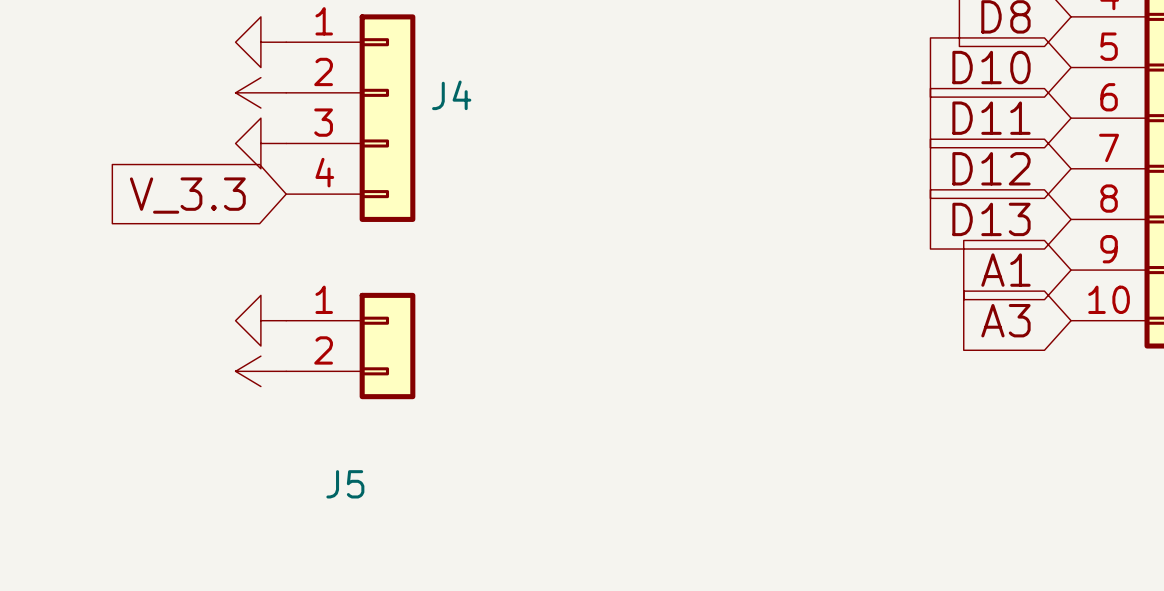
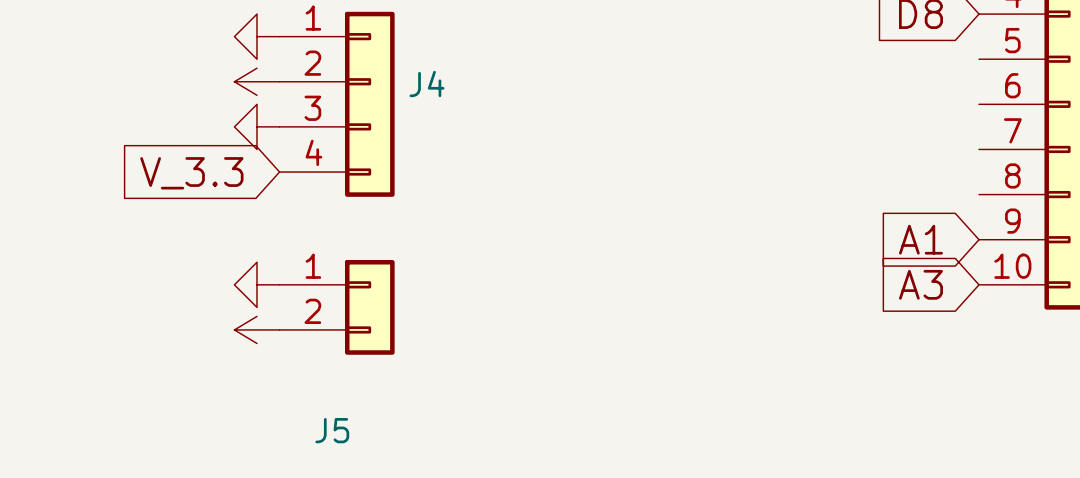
global label: D10 (991, 67) -> none
global label: D11 (991, 118) -> none
global label: D12 (991, 168) -> none
global label: D13 (991, 219) -> none

